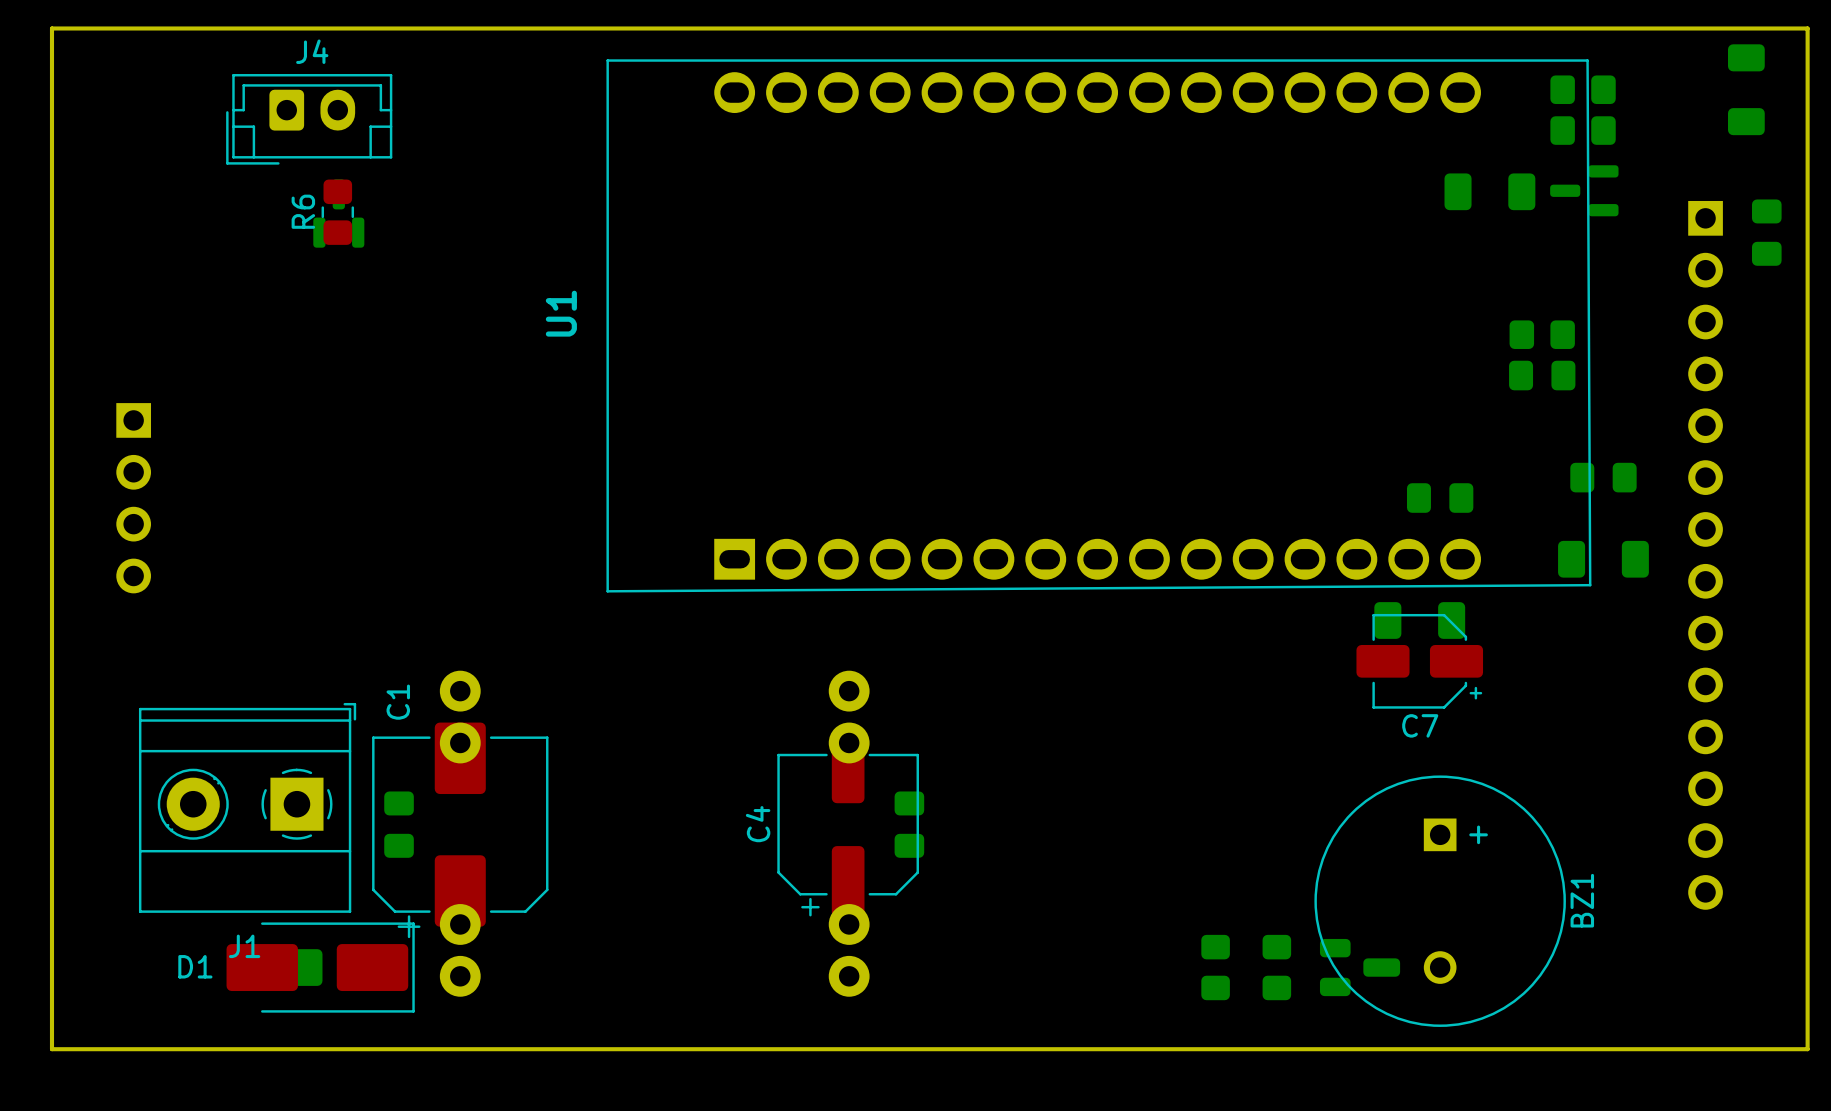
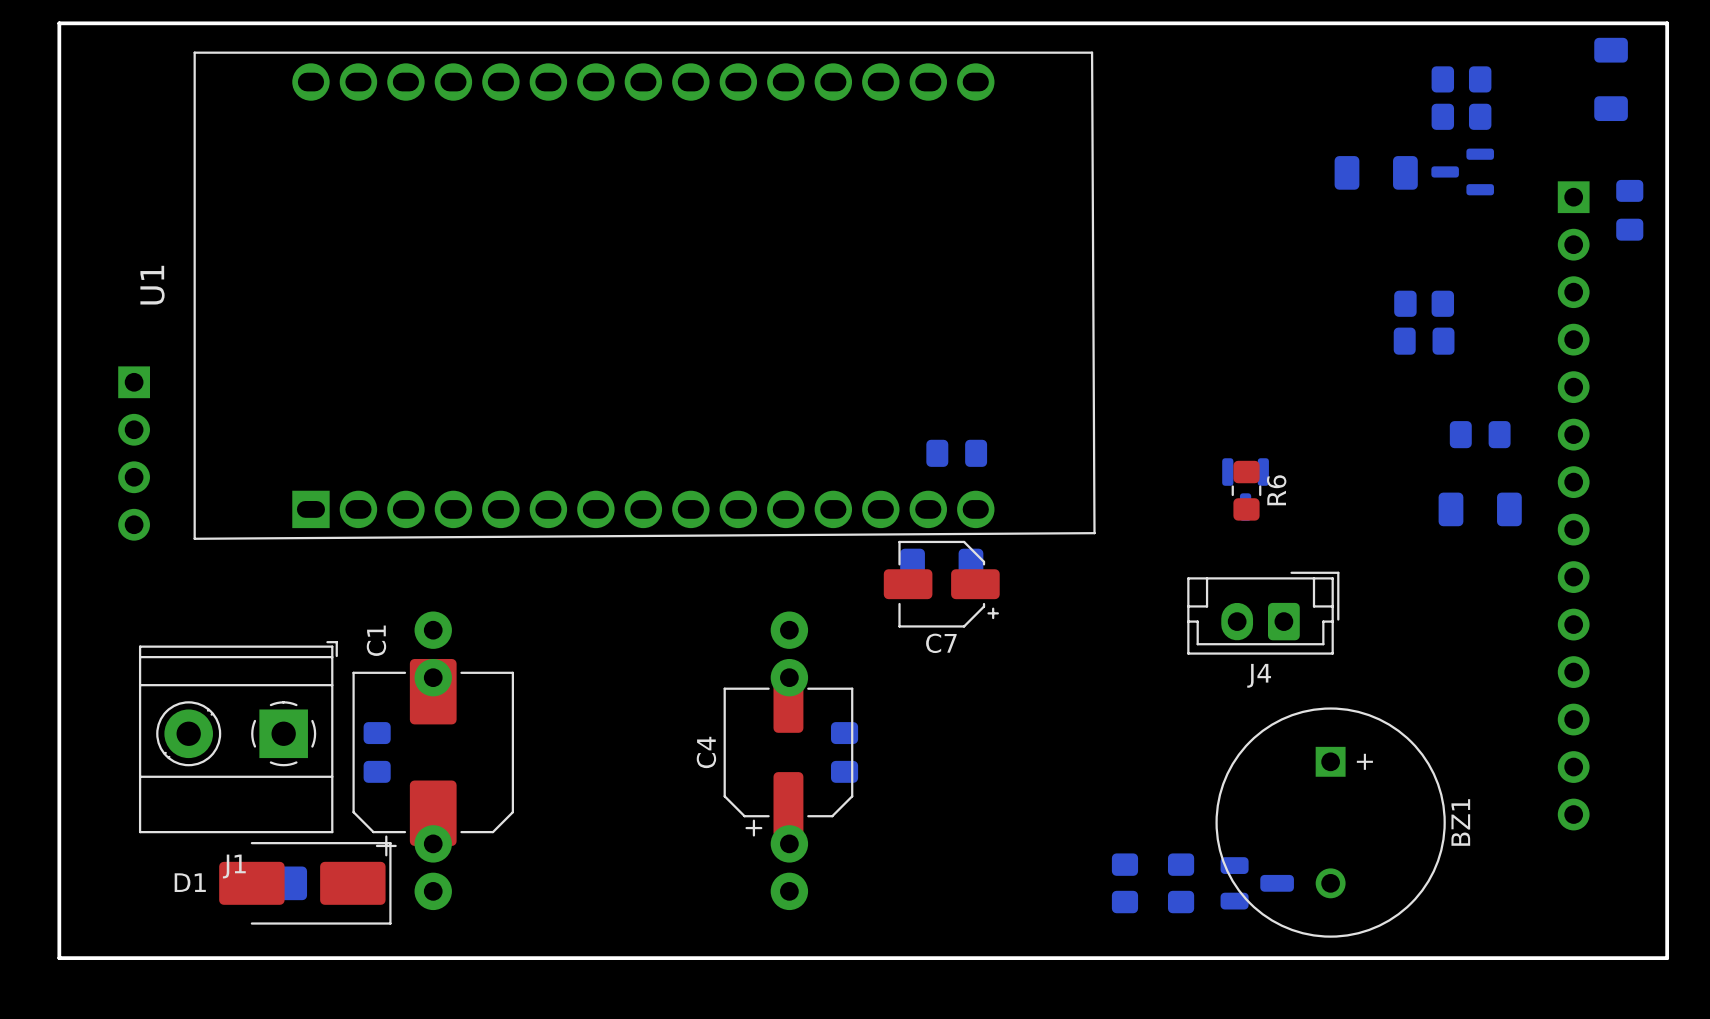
J4 rotation: 0° (309, 119) -> 180° (1263, 613)
J4 position: (309, 119) -> (1263, 613)
R6 name position: R6 (303, 211) -> R6 (1276, 490)
R6 position: (337, 212) -> (1246, 490)
part: (338, 213) -> none
U1 position: (1098, 325) -> (644, 295)
part position: (1440, 498) -> (956, 453)
part: none -> (1245, 489)
part position: (1419, 620) -> (941, 565)
C7 position: (1419, 661) -> (941, 584)

